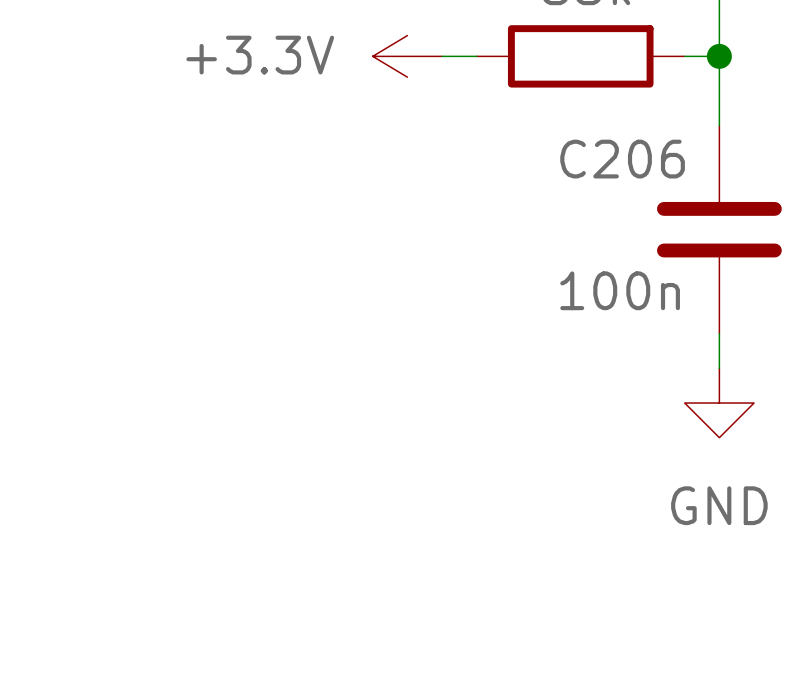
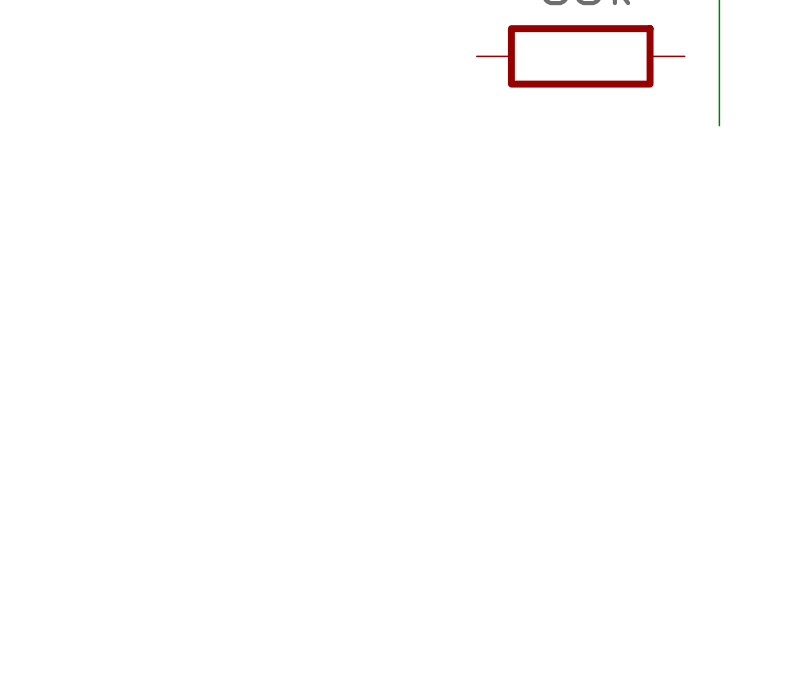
power symbol: +3.3V (407, 56) -> none
wire: (442, 56) (476, 56) -> none
wire: (684, 56) (719, 56) -> none
junction: (719, 56) -> none
C206: 100n (719, 229) -> none
wire: (719, 333) (719, 368) -> none
power symbol: GND (719, 403) -> none

